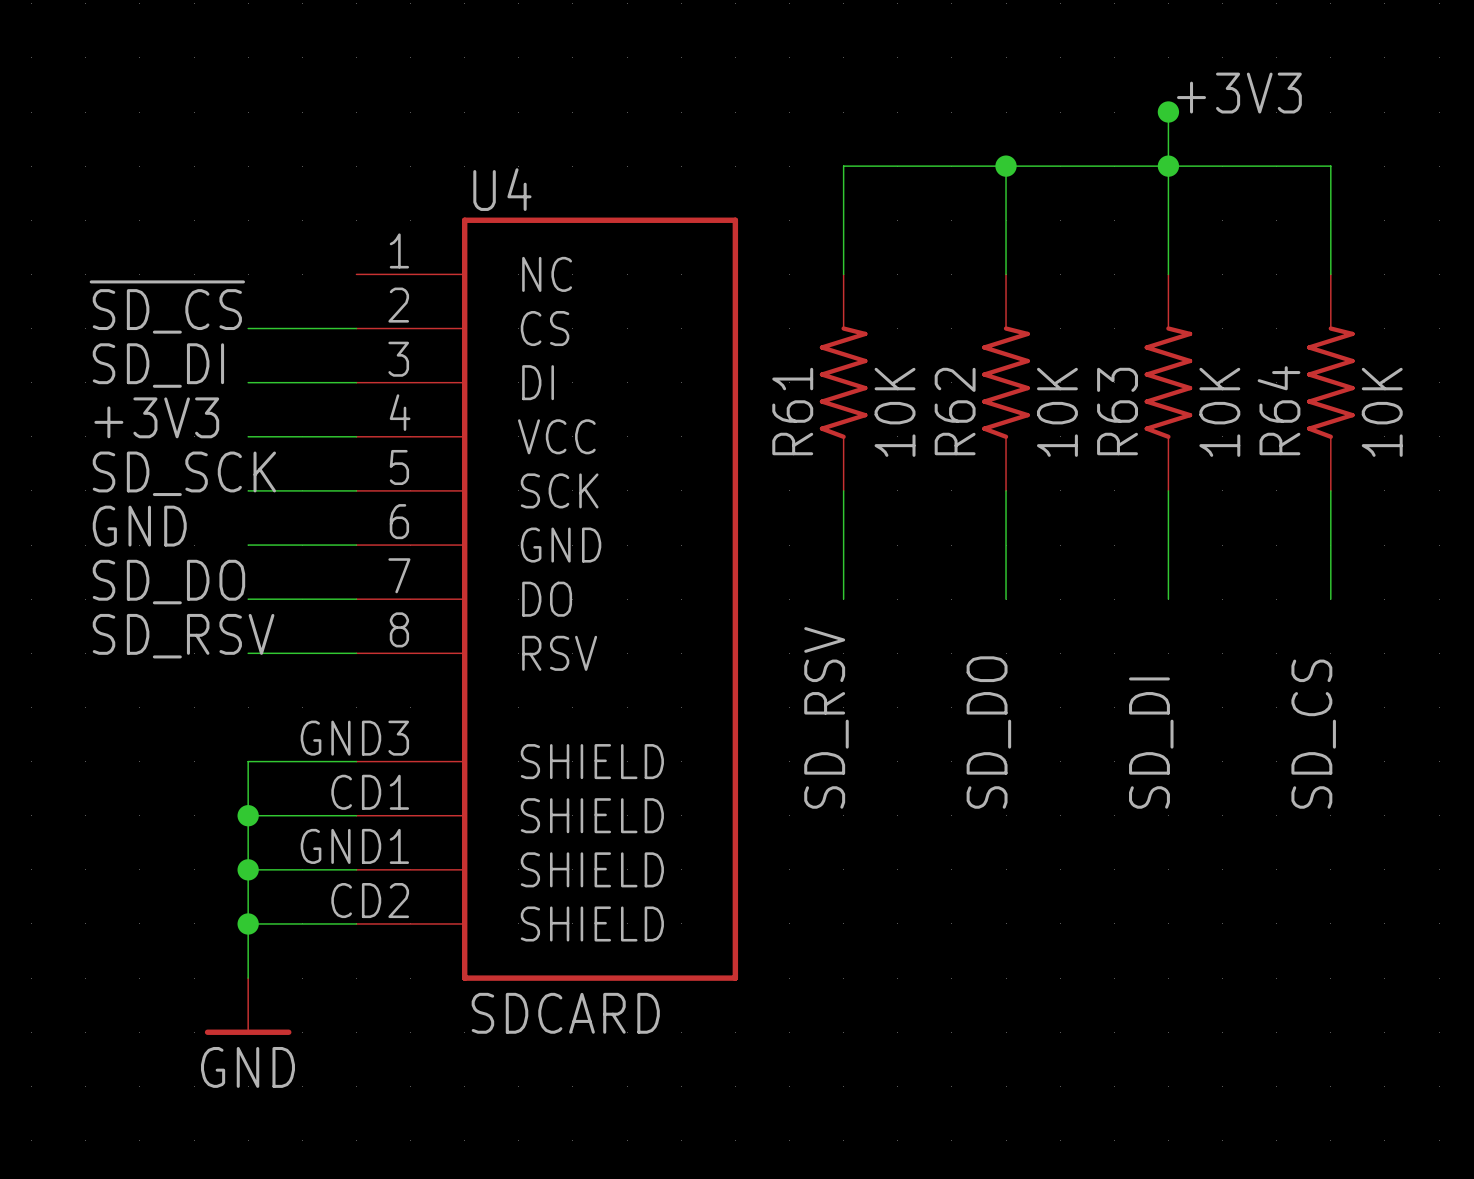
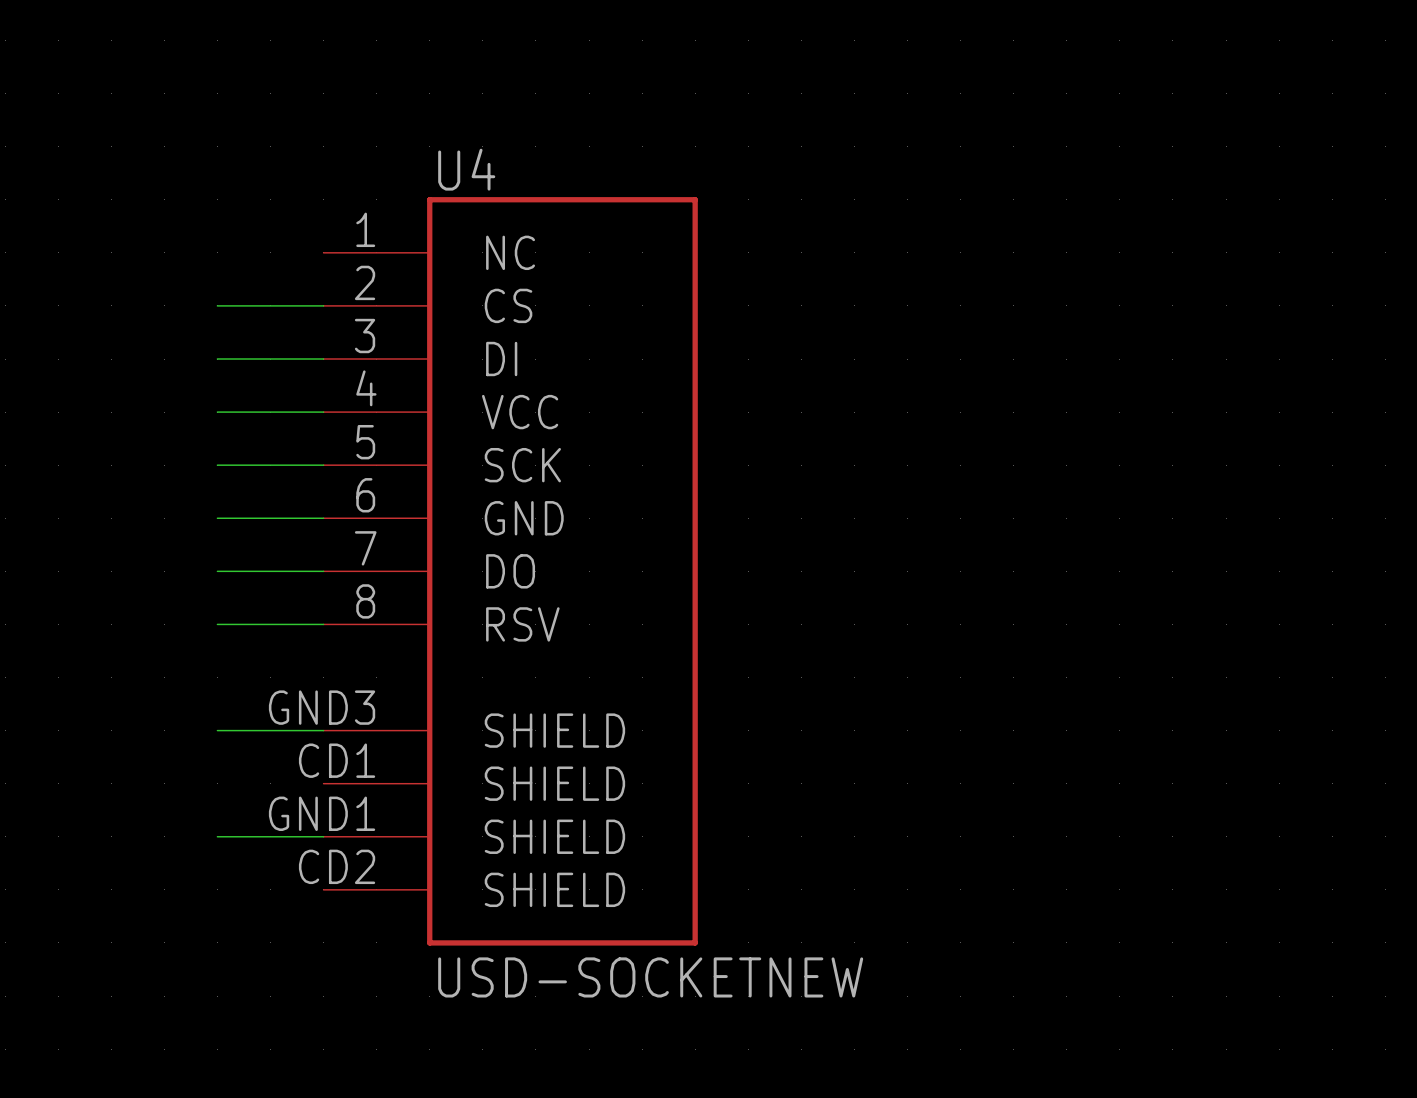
label: +3V3 (1239, 93) -> none
wire: (1168, 112) (1168, 274) -> none
junction: (1168, 112) -> none
wire: (1006, 166) (1006, 274) -> none
junction: (1006, 166) -> none
junction: (1168, 166) -> none
wire: (843, 274) (843, 166) (1330, 166) (1330, 274) -> none
label: ~{SD_CS} (167, 307) -> none
label: SD_DI (158, 365) -> none
R61: 10K (843, 382) -> none
R62: 10K (1006, 382) -> none
R63: 10K (1168, 382) -> none
R64: 10K (1330, 382) -> none
label: +3V3 (156, 417) -> none
label: SD_SCK (184, 473) -> none
wire: (843, 490) (843, 599) -> none
wire: (1006, 490) (1006, 599) -> none
wire: (1168, 490) (1168, 599) -> none
wire: (1330, 490) (1330, 599) -> none
label: GND (139, 526) -> none
label: SD_DO (168, 582) -> none
label: SD_RSV (183, 636) -> none
label: SD_RSV (826, 717) -> none
label: SD_DO (988, 732) -> none
label: SD_CS (1313, 734) -> none
label: SD_DI (1151, 743) -> none
wire: (248, 761) (248, 978) -> none
wire: (248, 815) (356, 815) -> none
junction: (248, 815) -> none
junction: (248, 869) -> none
wire: (248, 923) (356, 923) -> none
junction: (248, 923) -> none
power symbol: GND (248, 1006) -> none
U4 value: SDCARD (565, 1013) -> USD-SOCKETNEW (650, 977)

